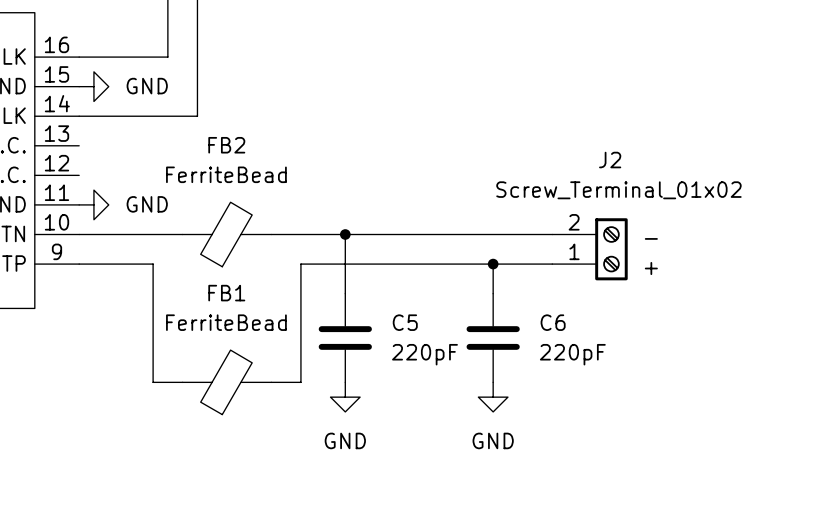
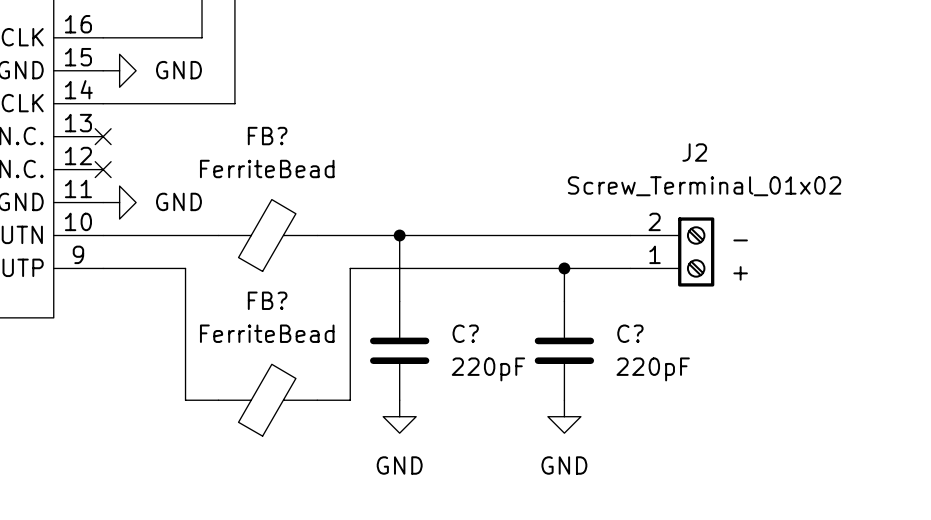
no-connect mark: none -> (103, 136)
FB2 name: FB2 (226, 145) -> FB? (267, 136)
no-connect mark: none -> (103, 169)
FB1 name: FB1 (226, 293) -> FB? (267, 300)
C5 name: C5 (405, 322) -> C? (465, 333)
C6 name: C6 (553, 322) -> C? (630, 333)

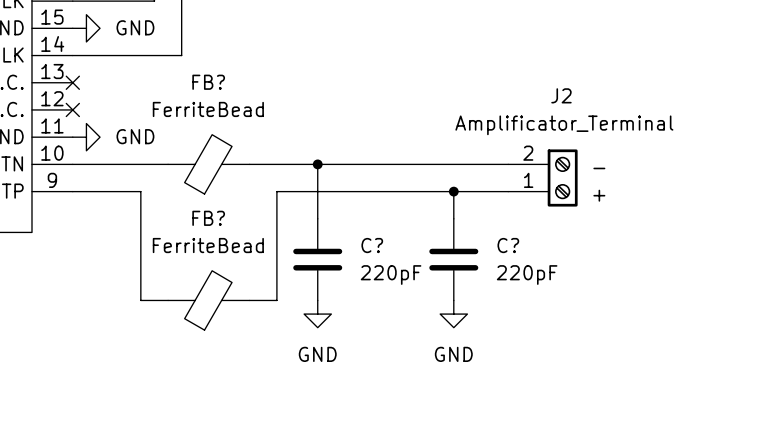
J2 value: Screw_Terminal_01x02 (704, 186) -> Amplificator_Terminal (564, 125)

